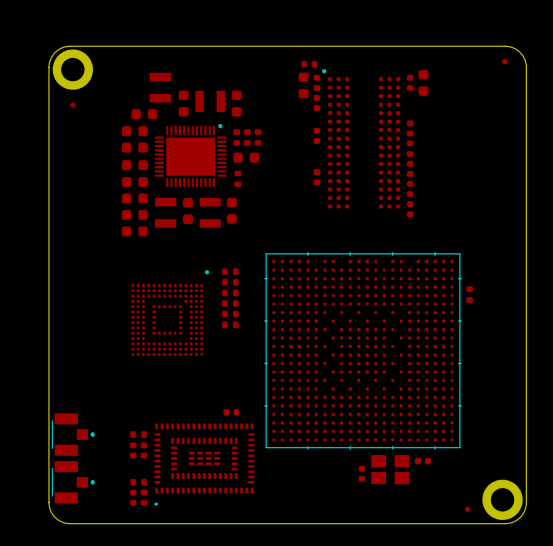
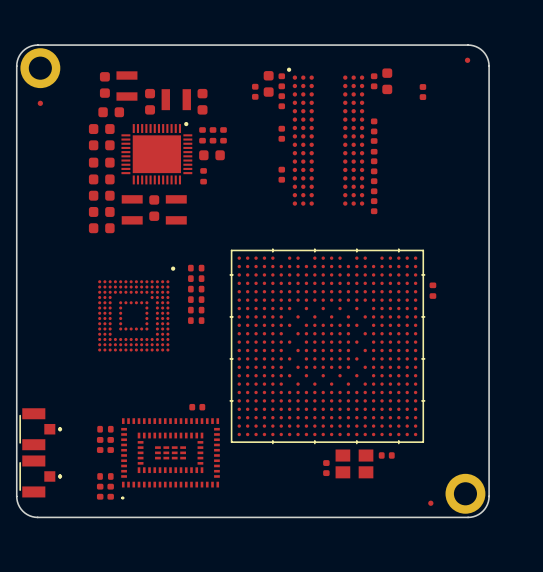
part rotation: 0° (309, 64) -> 90° clockwise (255, 91)
part position: (309, 64) -> (255, 91)
part: none -> (422, 92)
part position: (231, 210) -> (104, 84)

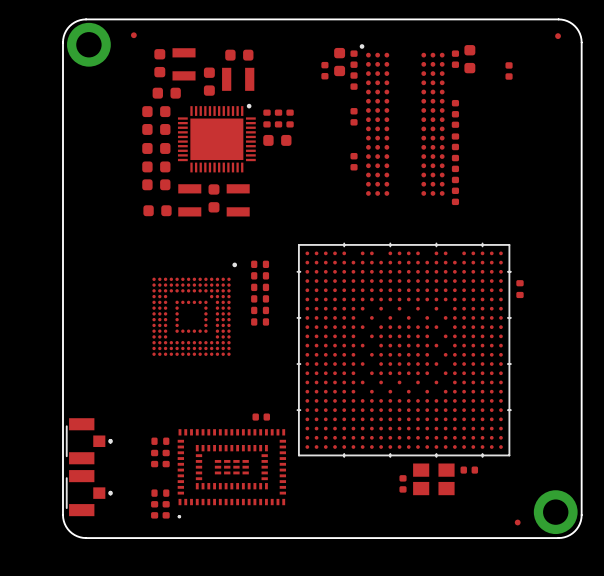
part rotation: 0° (202, 101) -> 90° clockwise (239, 55)
part position: (202, 101) -> (239, 55)
part position: (40, 103) -> (133, 35)
part: (203, 176) -> none
part: (101, 211) -> none
part: none -> (157, 210)
part: (101, 228) -> none

